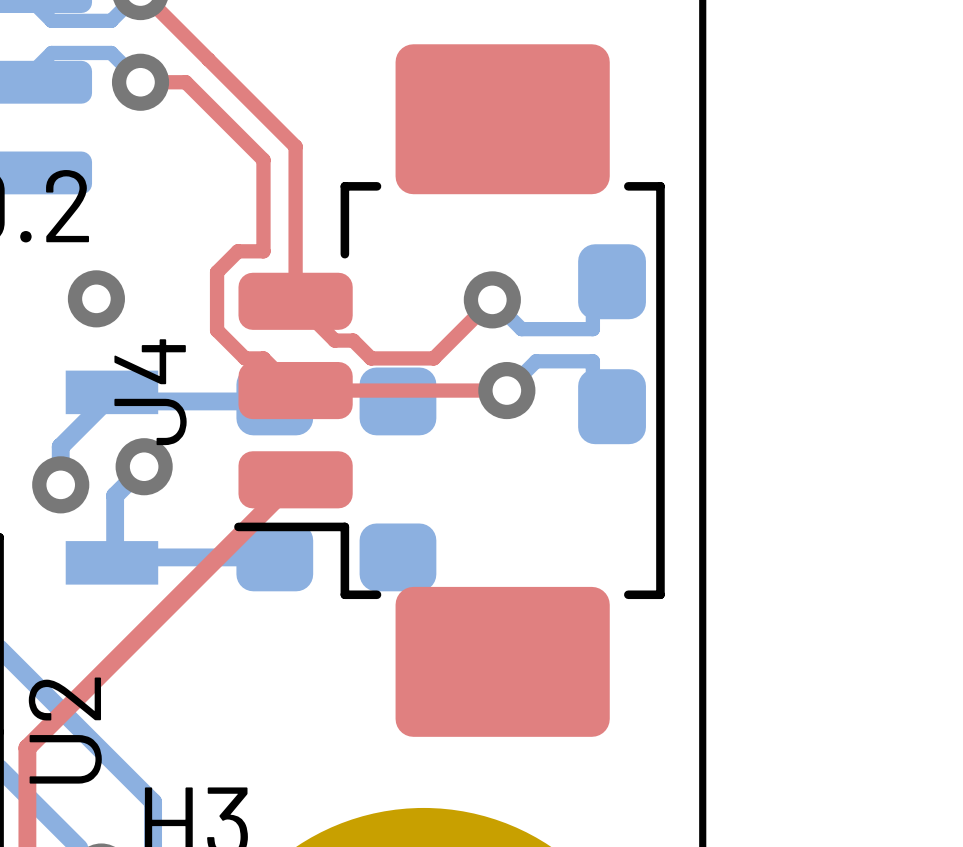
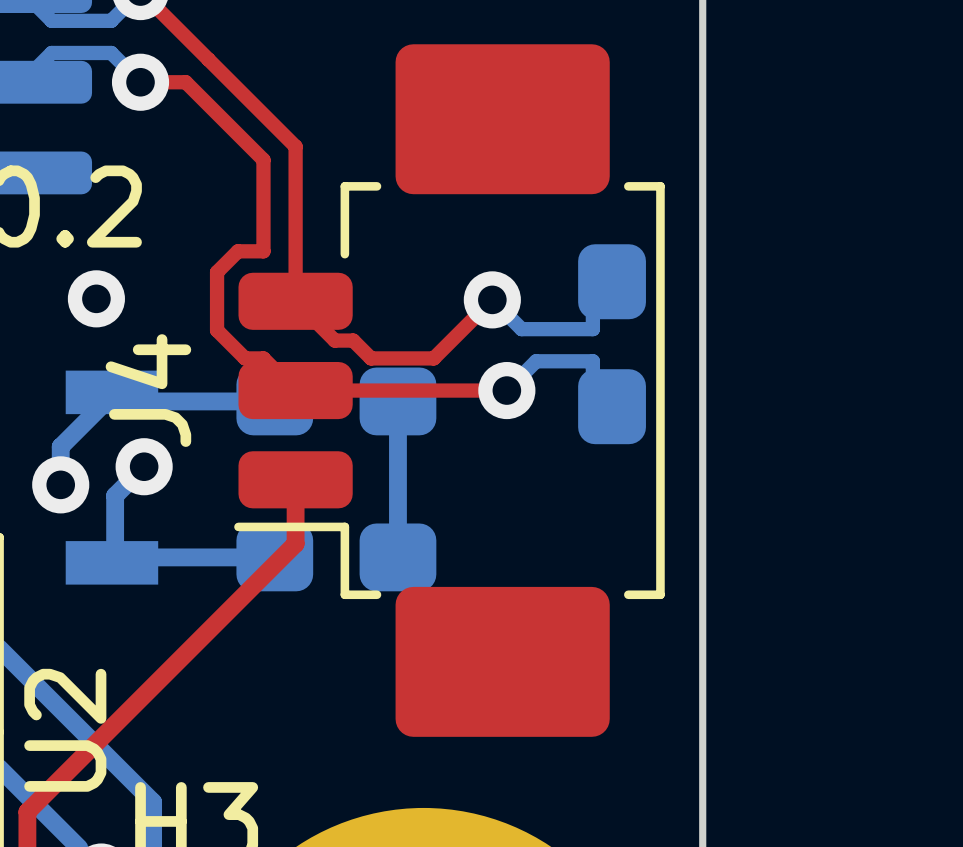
bottom track: none -> (397, 401) (397, 557)
top track: (295, 479) (27, 748) (27, 811) -> (295, 479) (295, 543) (27, 811)

